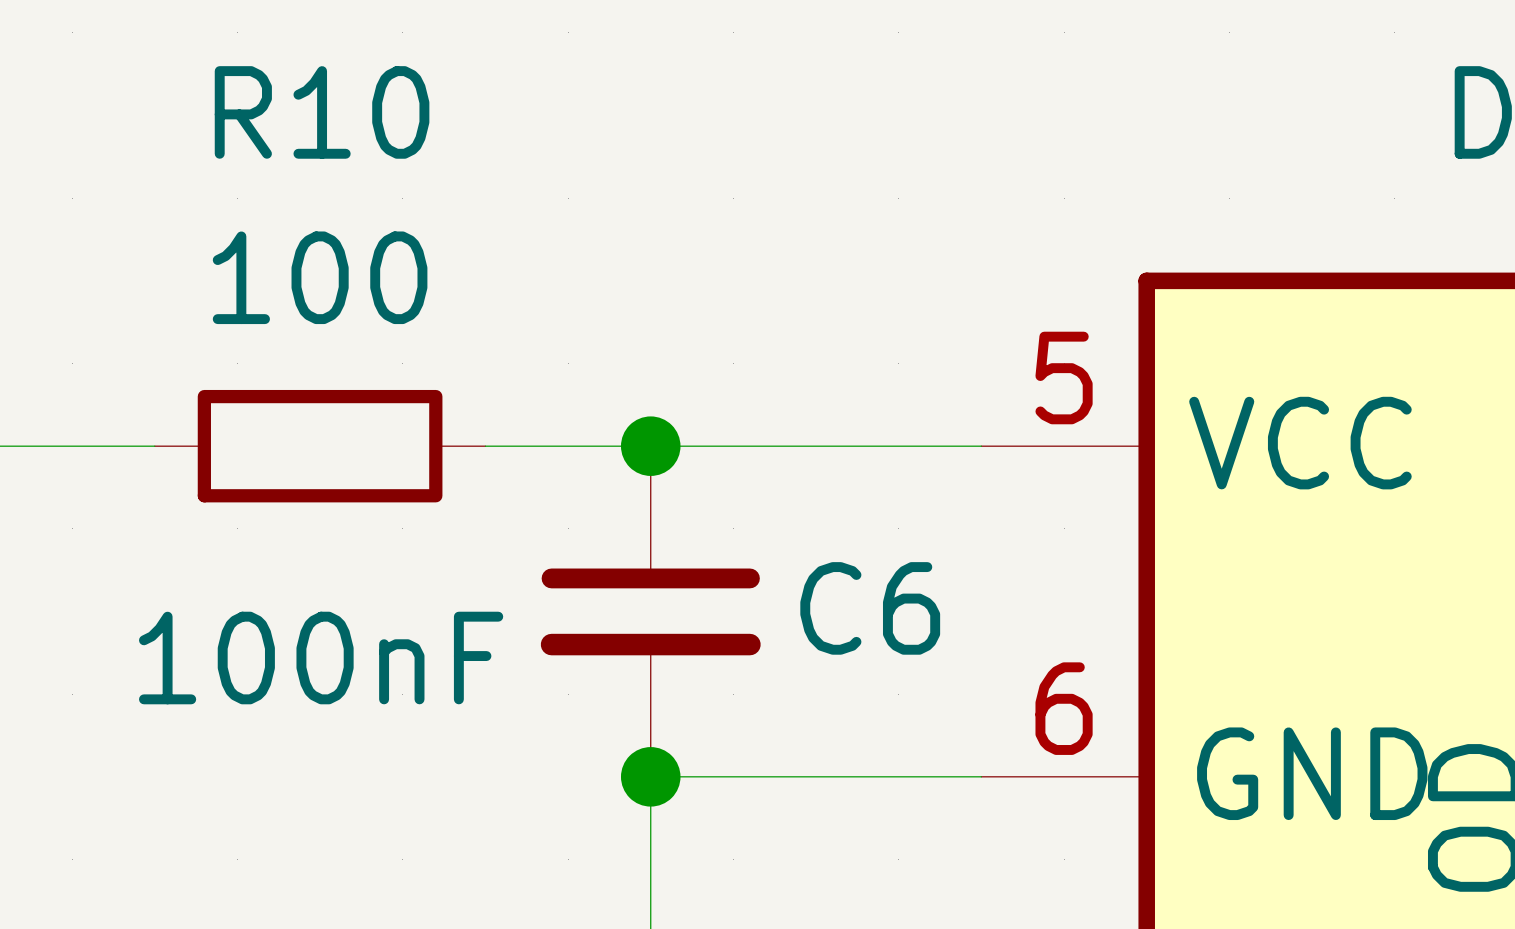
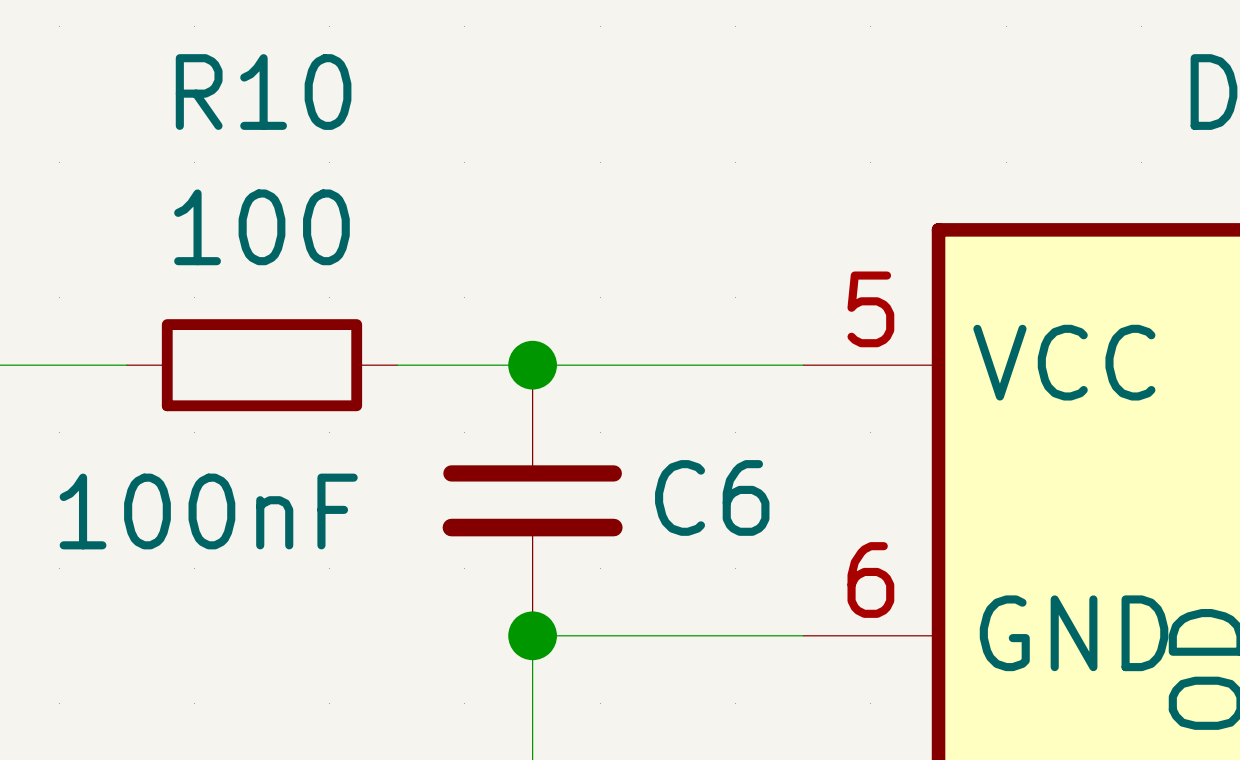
C6 value position: 100nF (321, 658) -> 100nF (208, 511)

